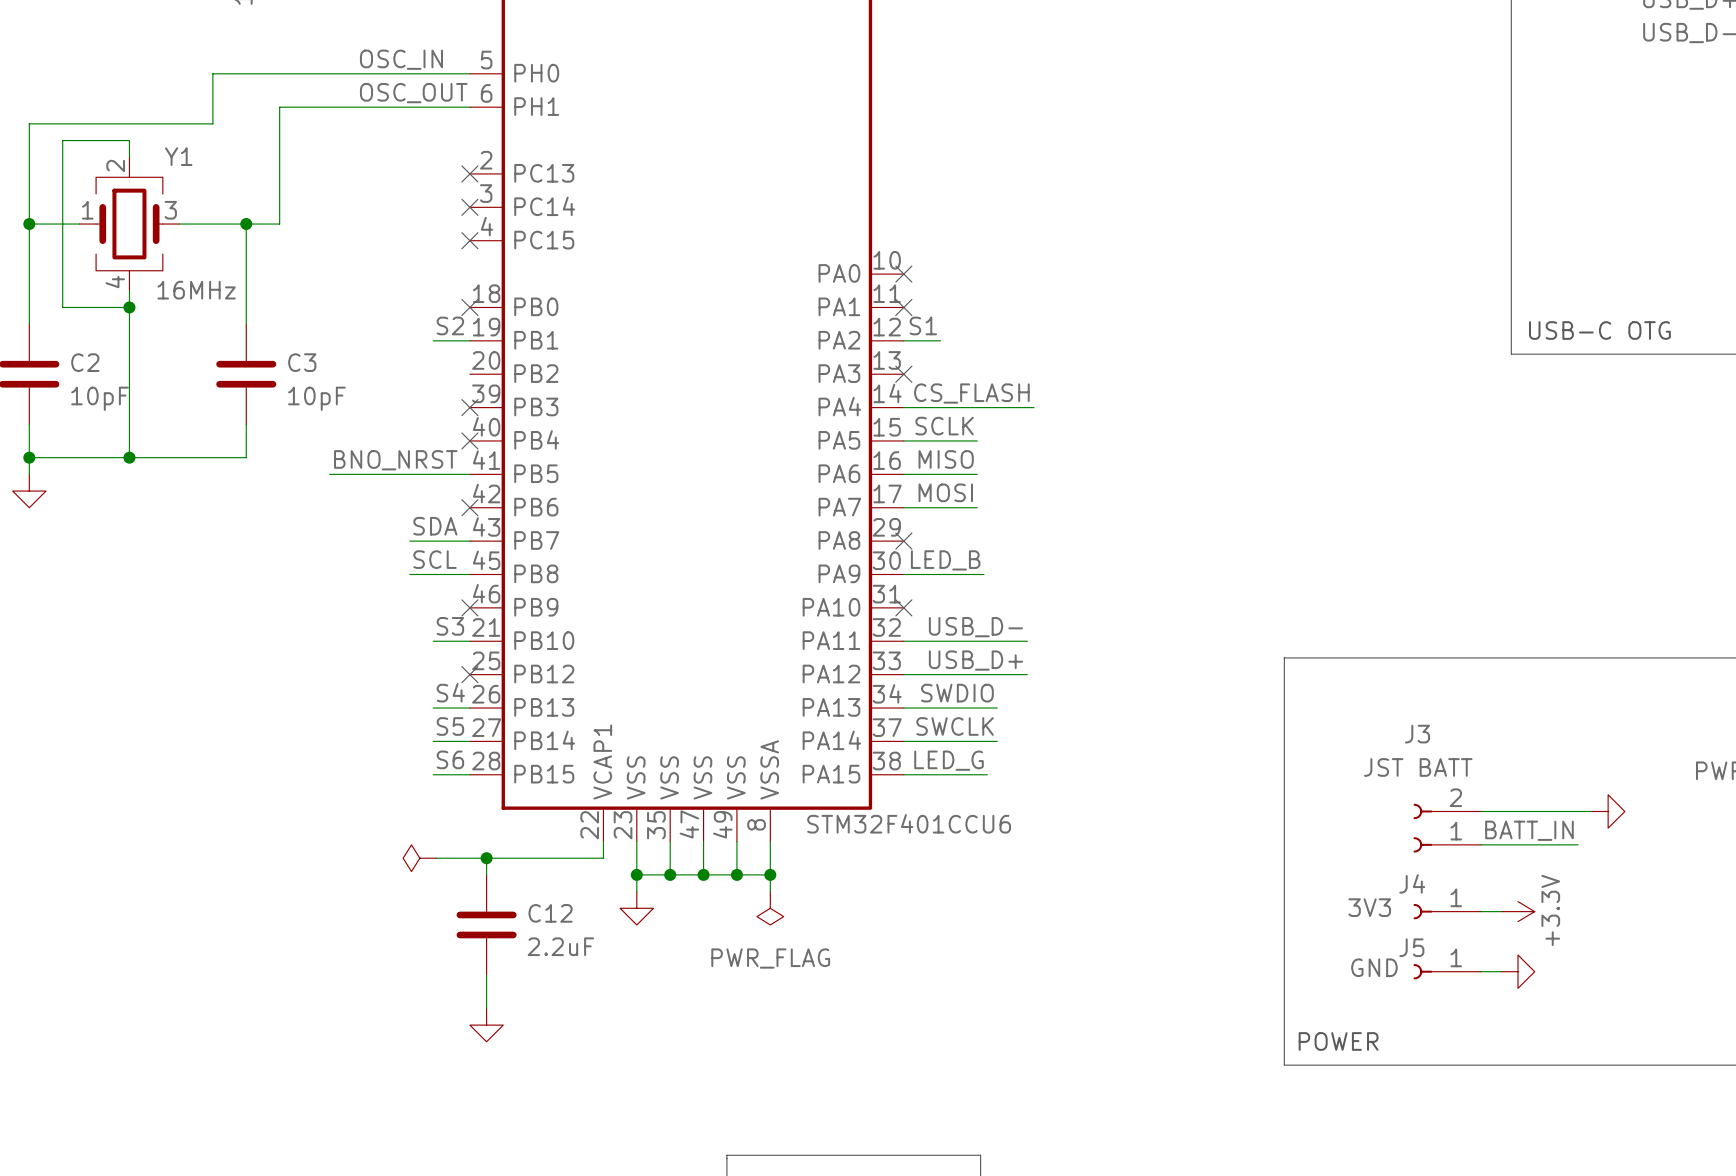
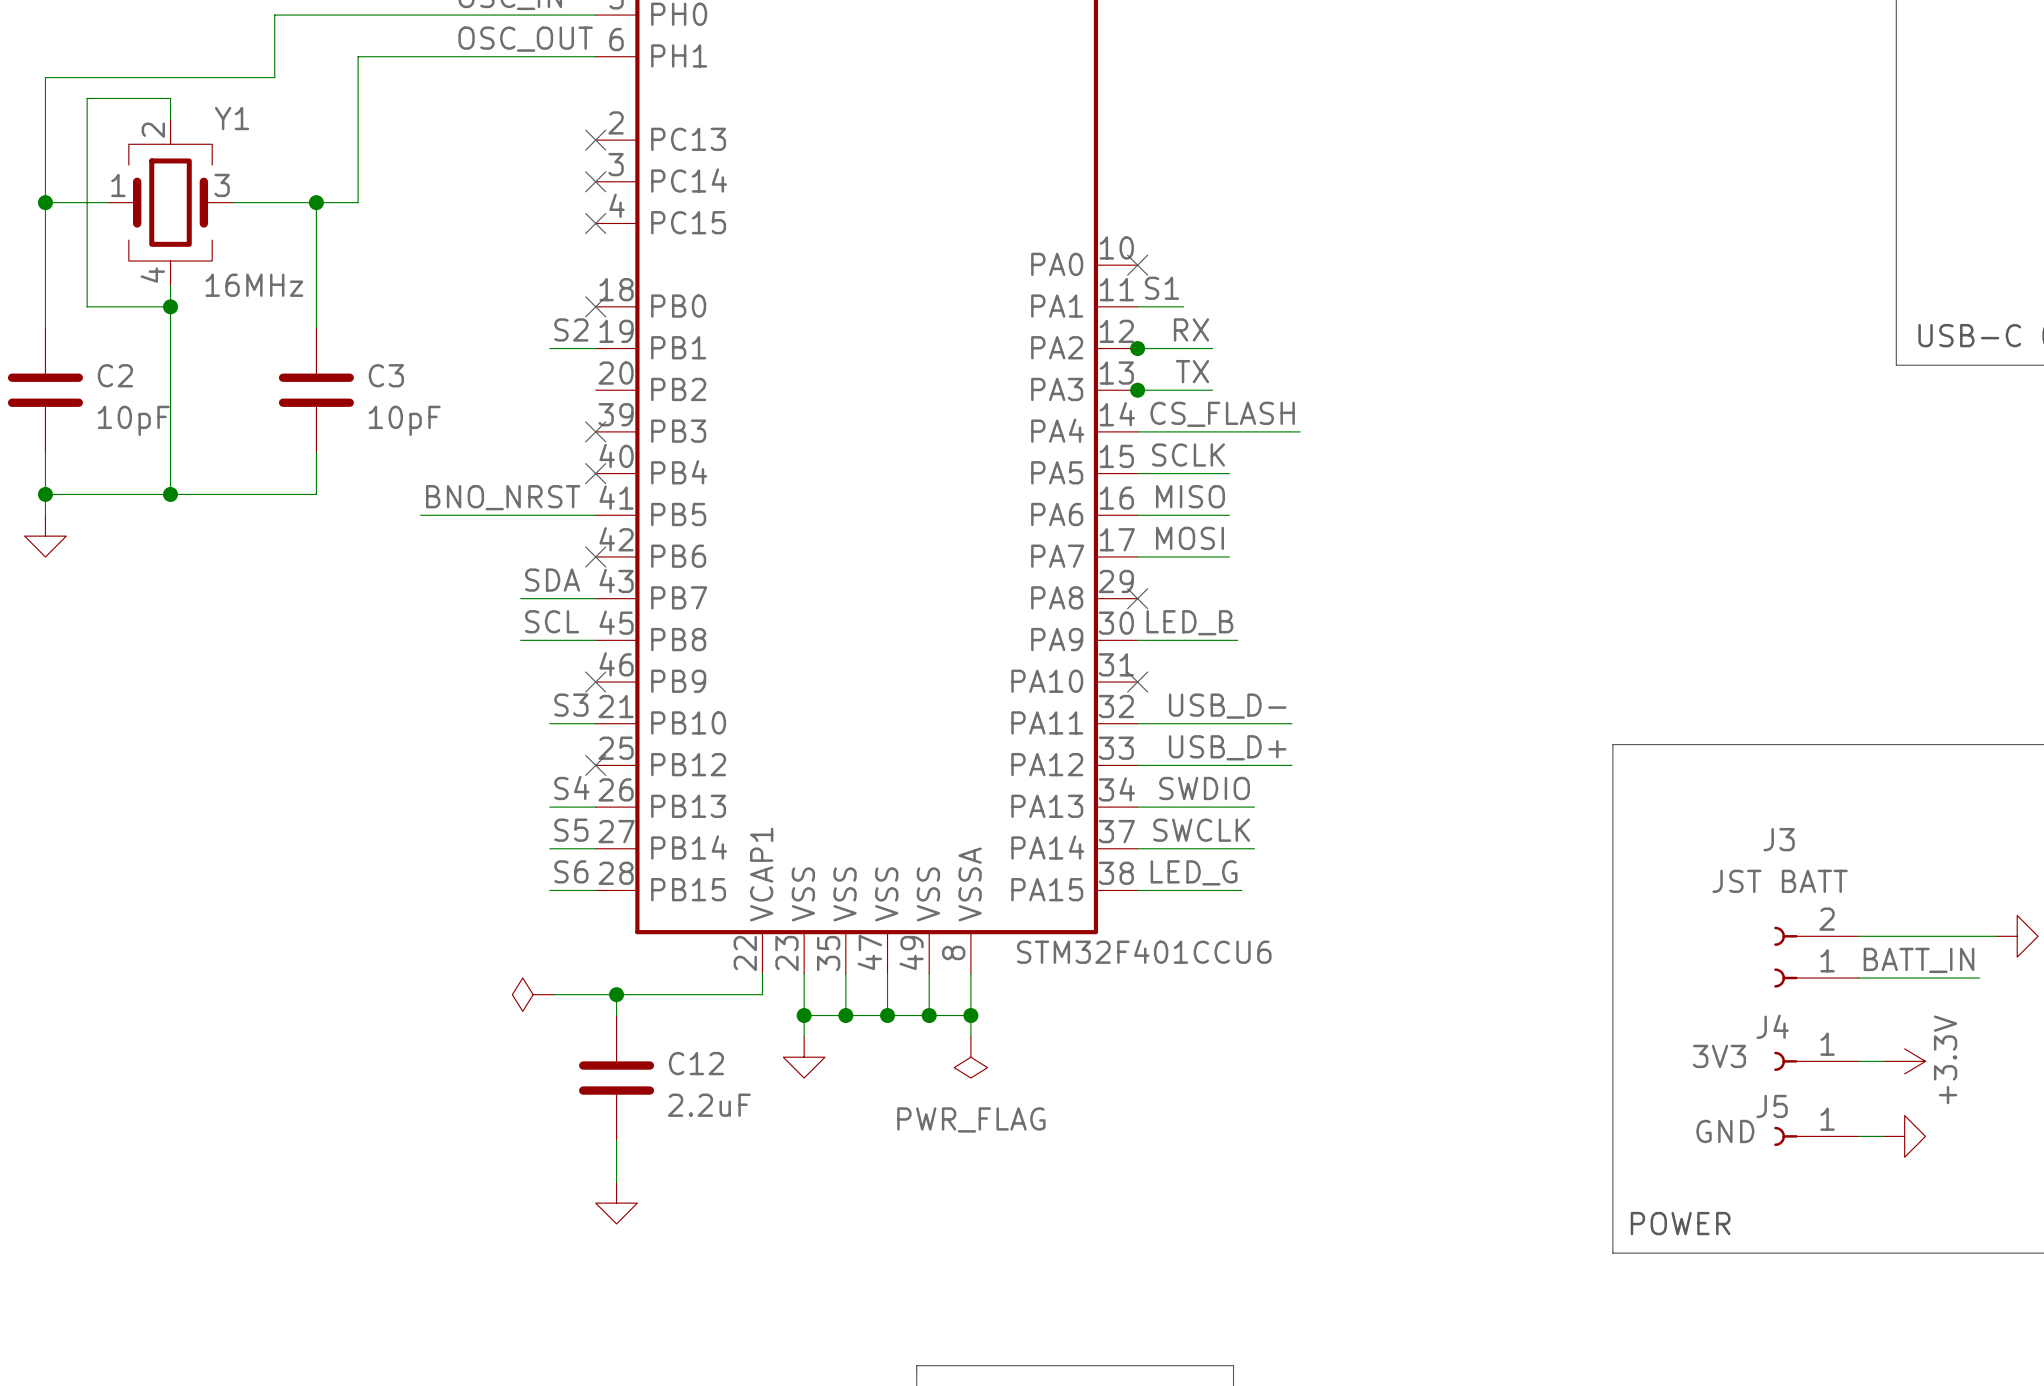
wire: none -> (1137, 306) (1183, 306)
no-connect mark: (903, 307) -> none
label position: S1 (923, 325) -> S1 (1162, 288)
label: none -> RX (1191, 329)
junction: none -> (1137, 348)
wire: none -> (1183, 348) (1212, 348)
label: none -> TX (1192, 371)
wire: none -> (1137, 390) (1212, 390)
no-connect mark: (903, 374) -> none
junction: none -> (1137, 390)

